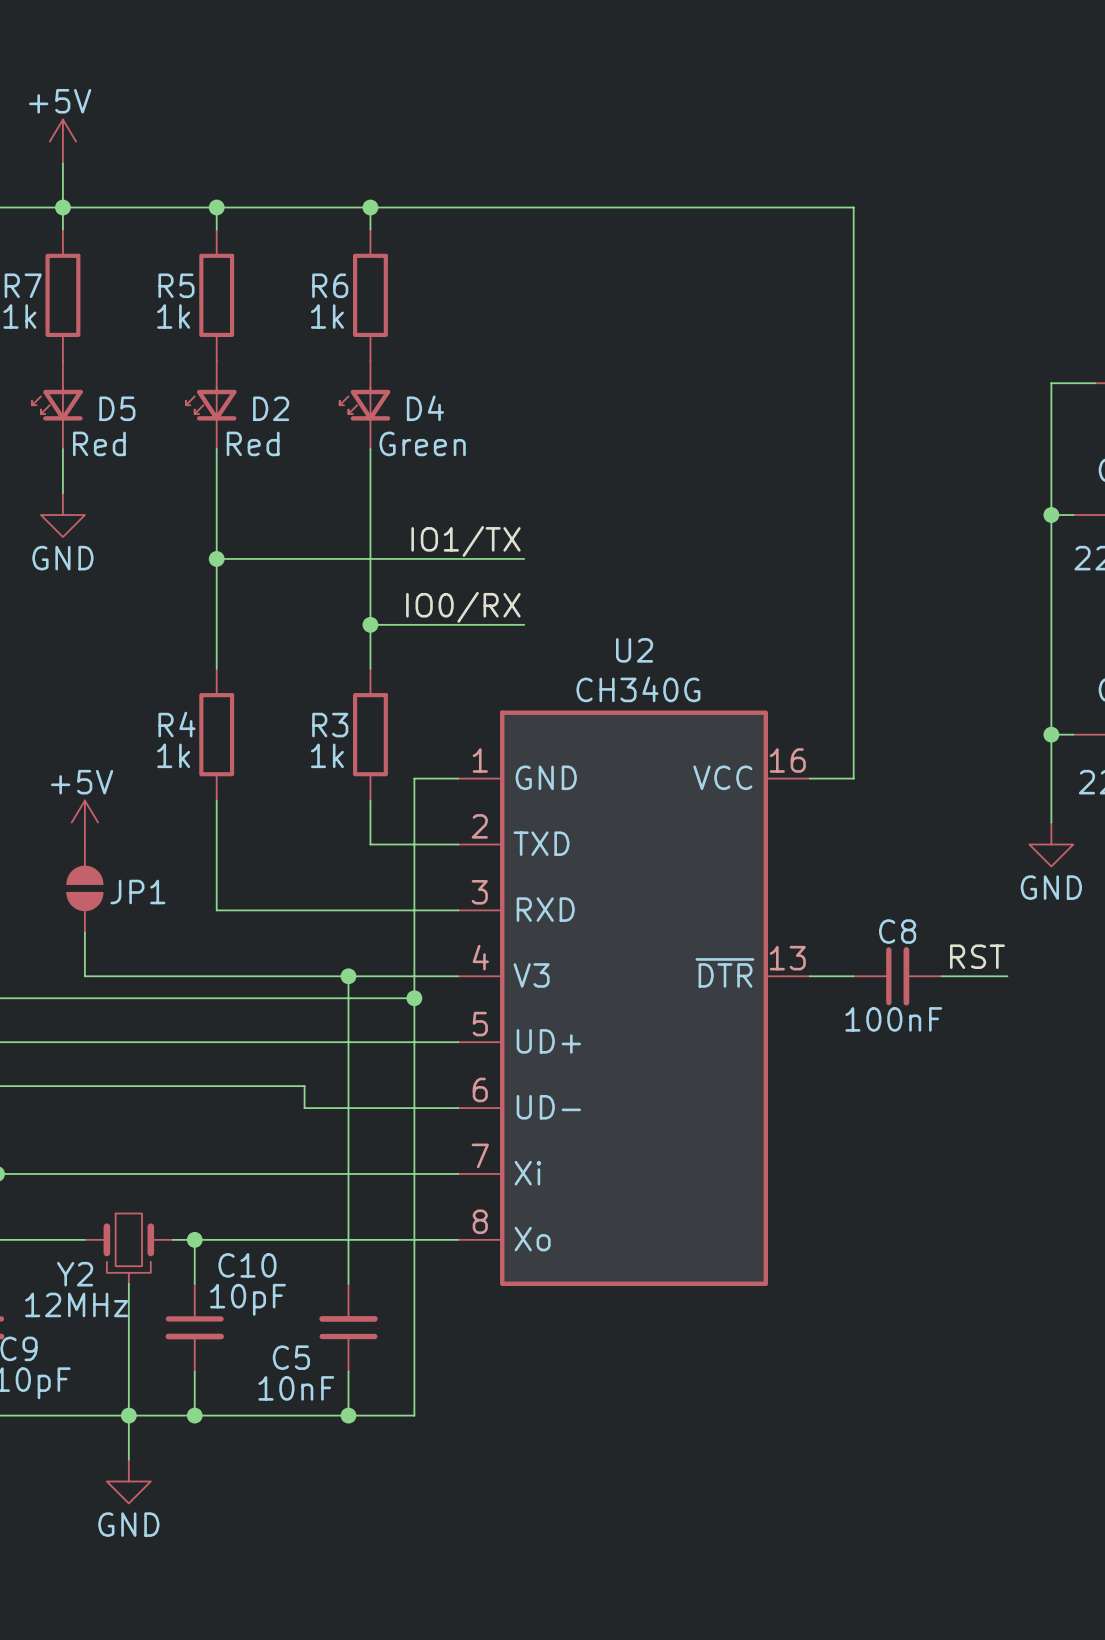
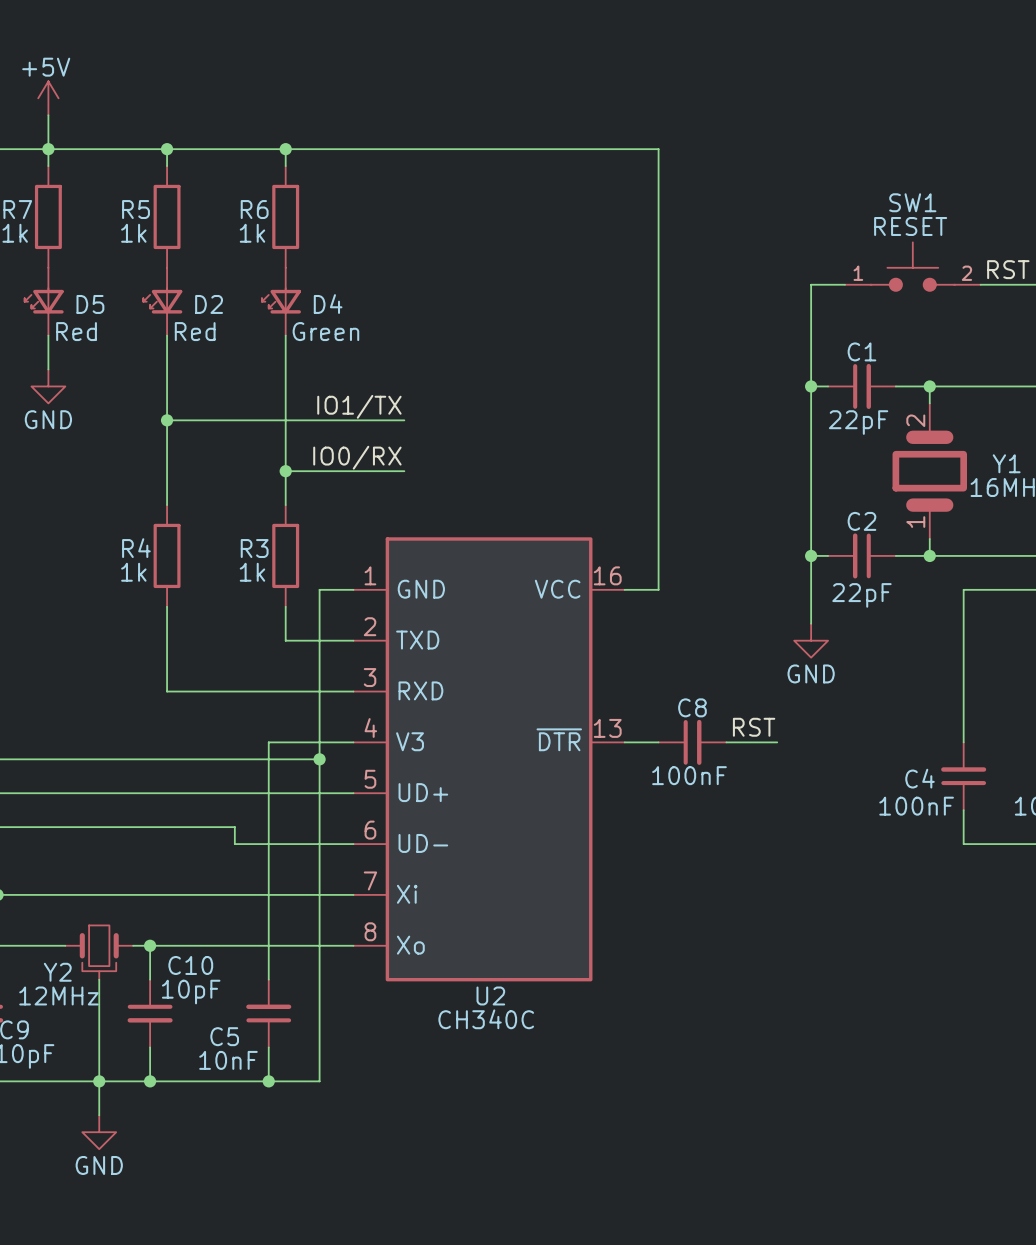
U2 name position: U2 (634, 650) -> U2 (490, 995)
U2 value: CH340G (638, 689) -> CH340C (486, 1019)
power symbol: +5V (84, 822) -> none
JP1: (84, 888) -> none
wire: (84, 932) (84, 976) (348, 976) -> none
junction: (348, 976) -> none

